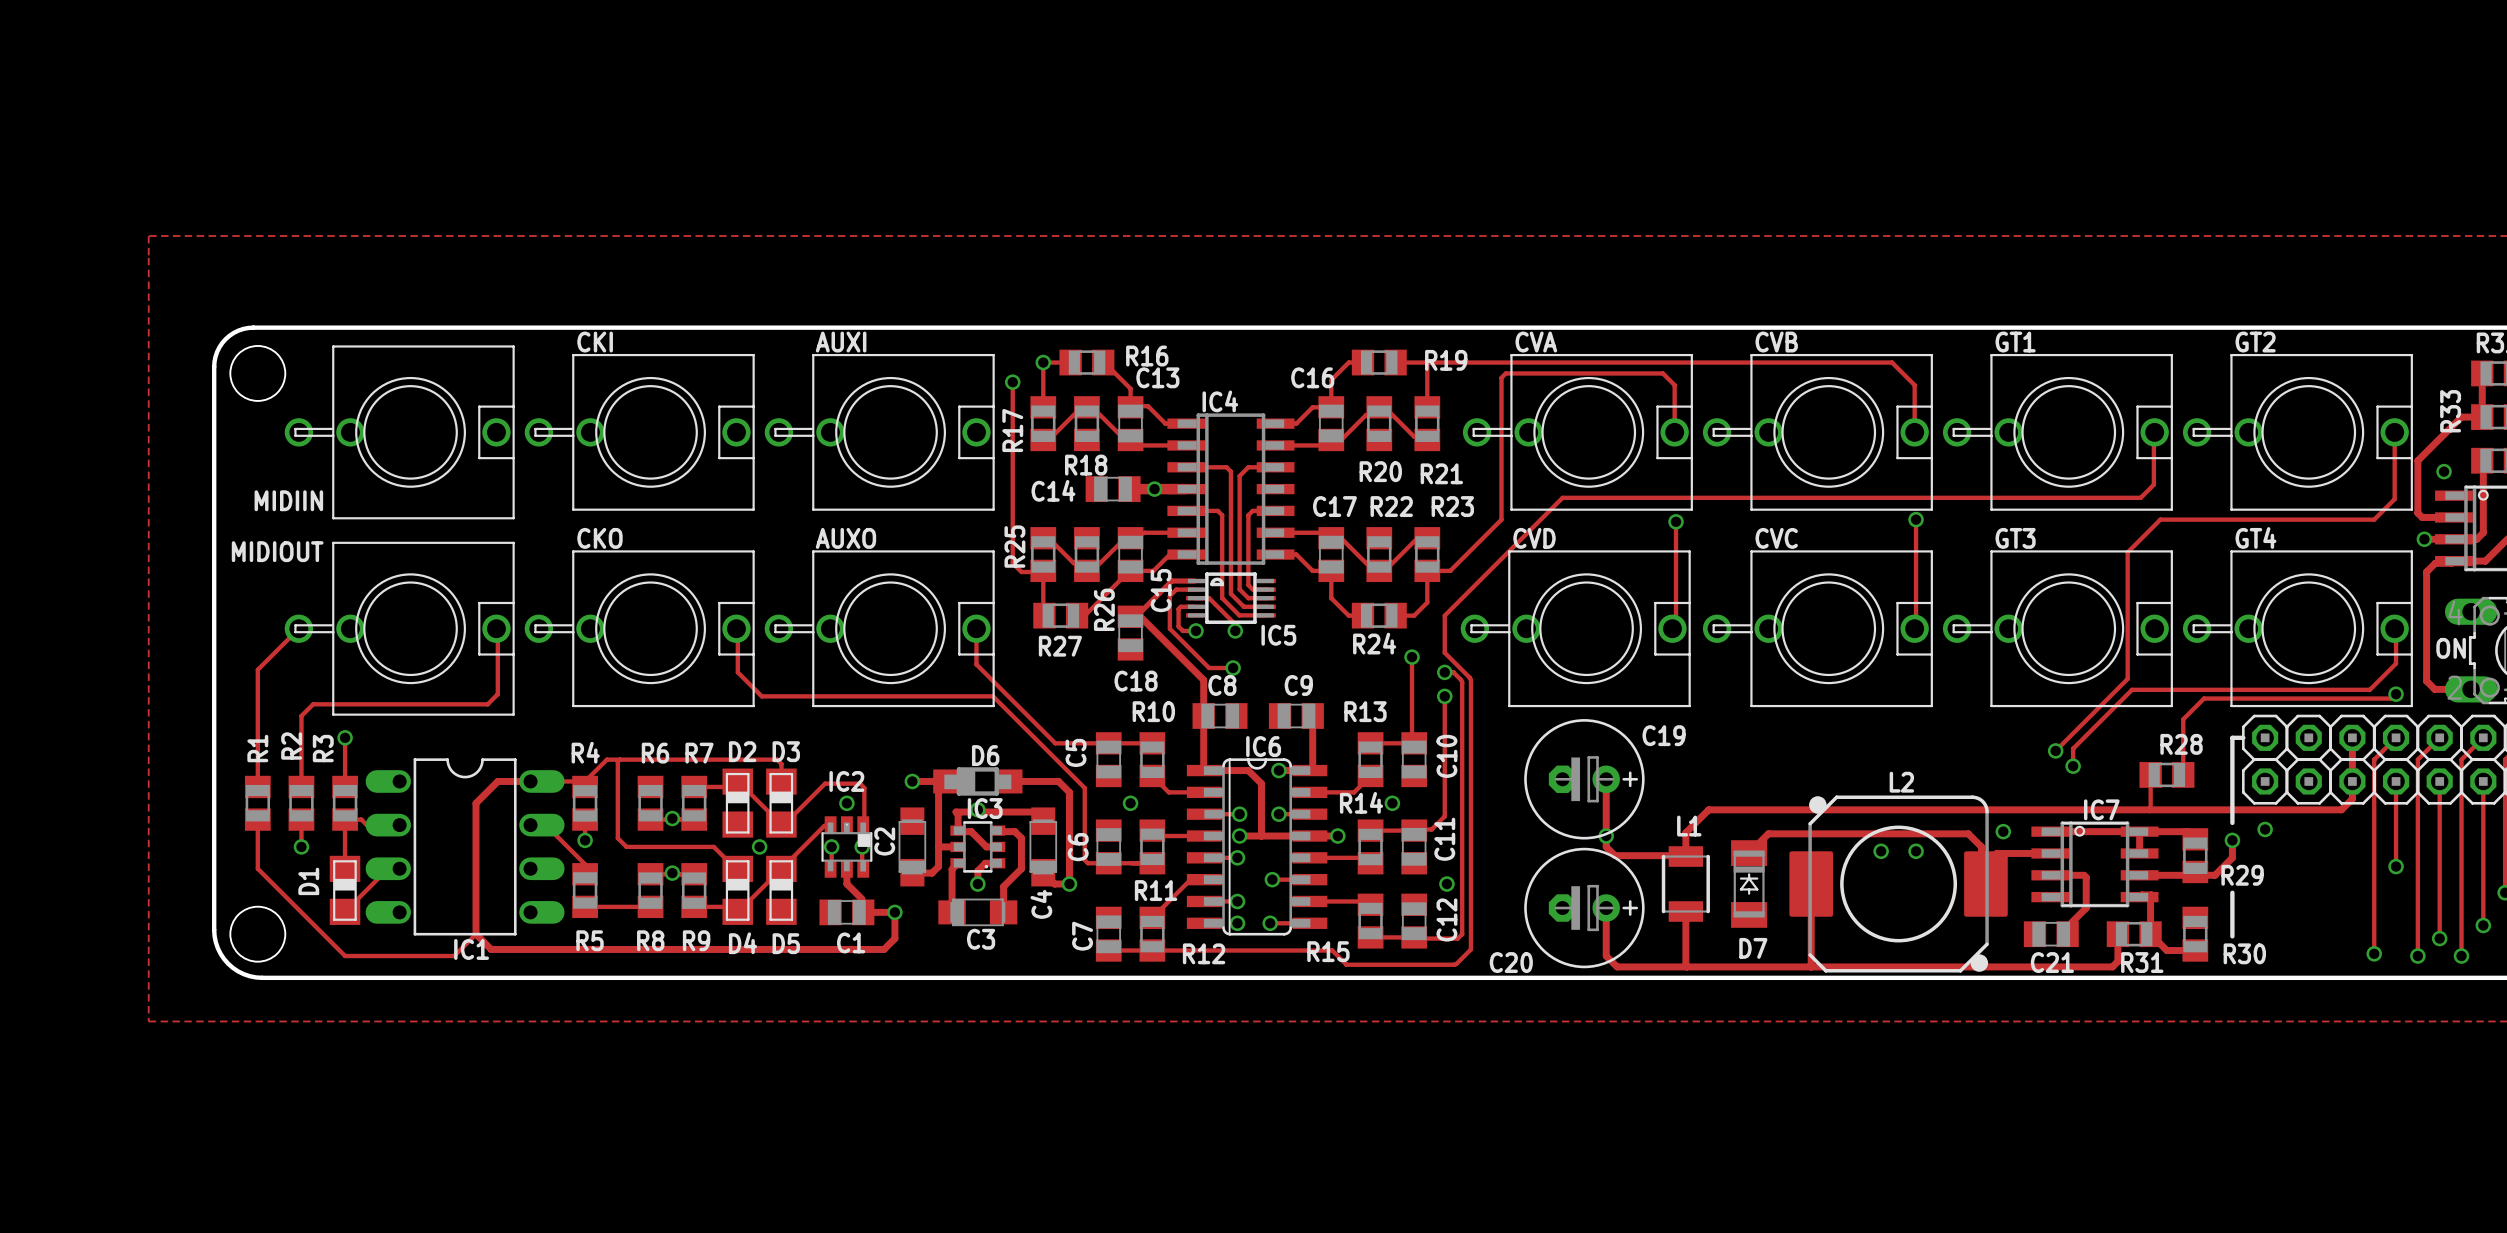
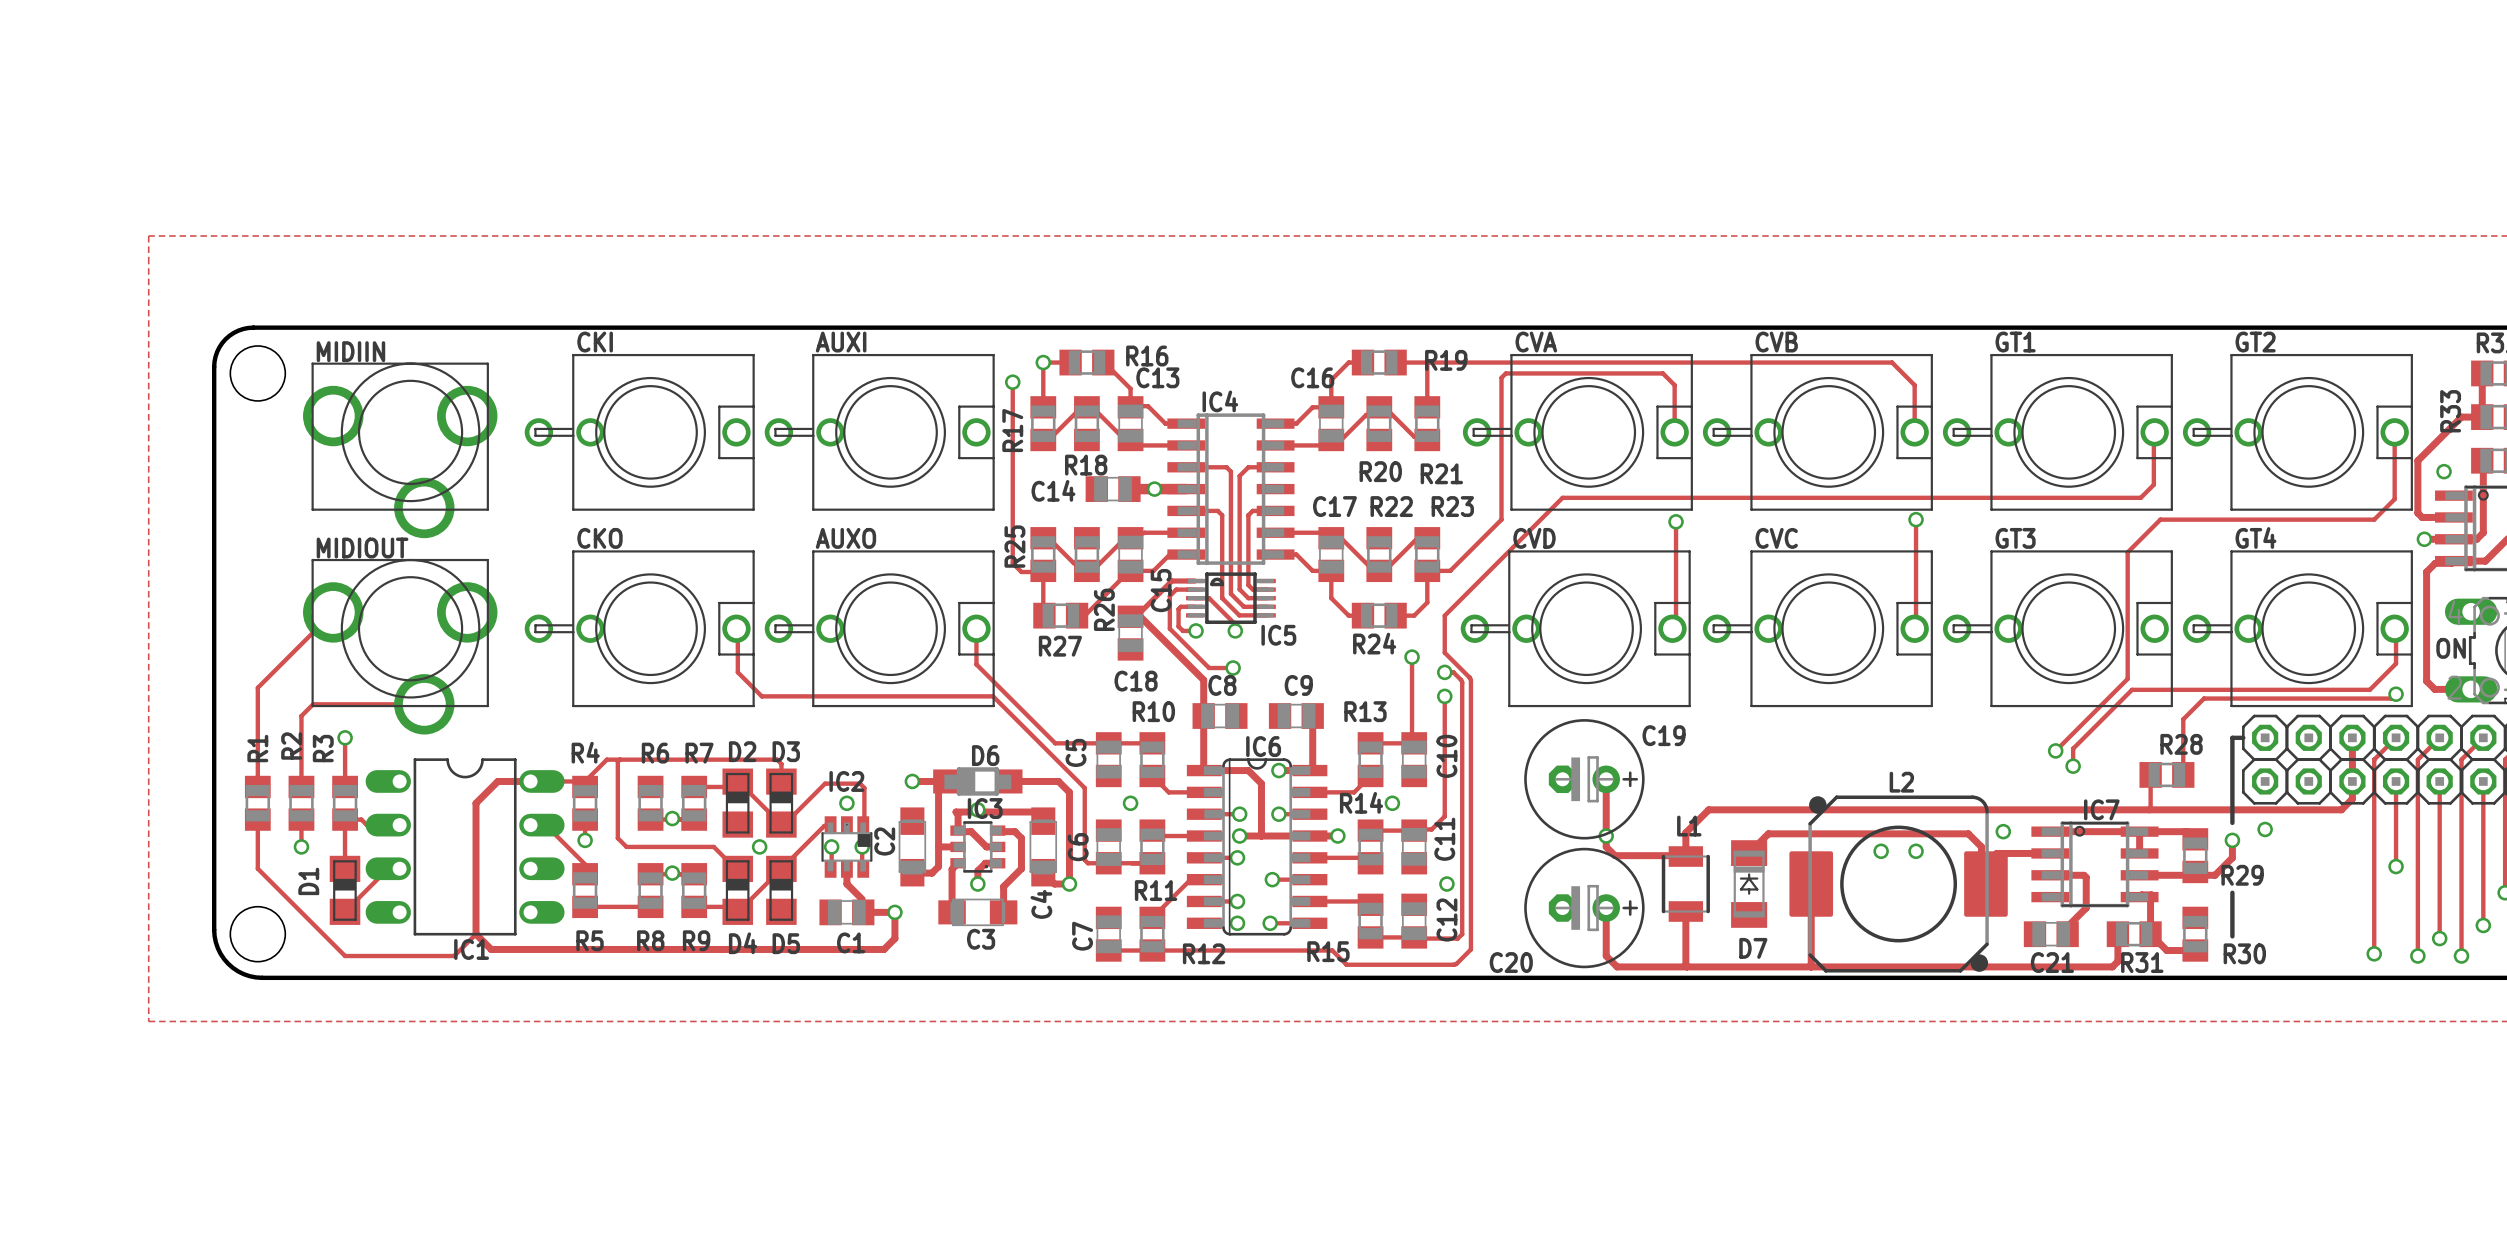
MIDIIN: (399, 432) -> none
MIDIIN: none -> (400, 450)
track: (298, 628) (257, 669) (257, 687) -> (333, 612) (257, 687)
MIDIOUT: (399, 628) -> none
track: (496, 628) (497, 694) (487, 704) (424, 704) -> none
MIDIOUT: none -> (400, 646)

